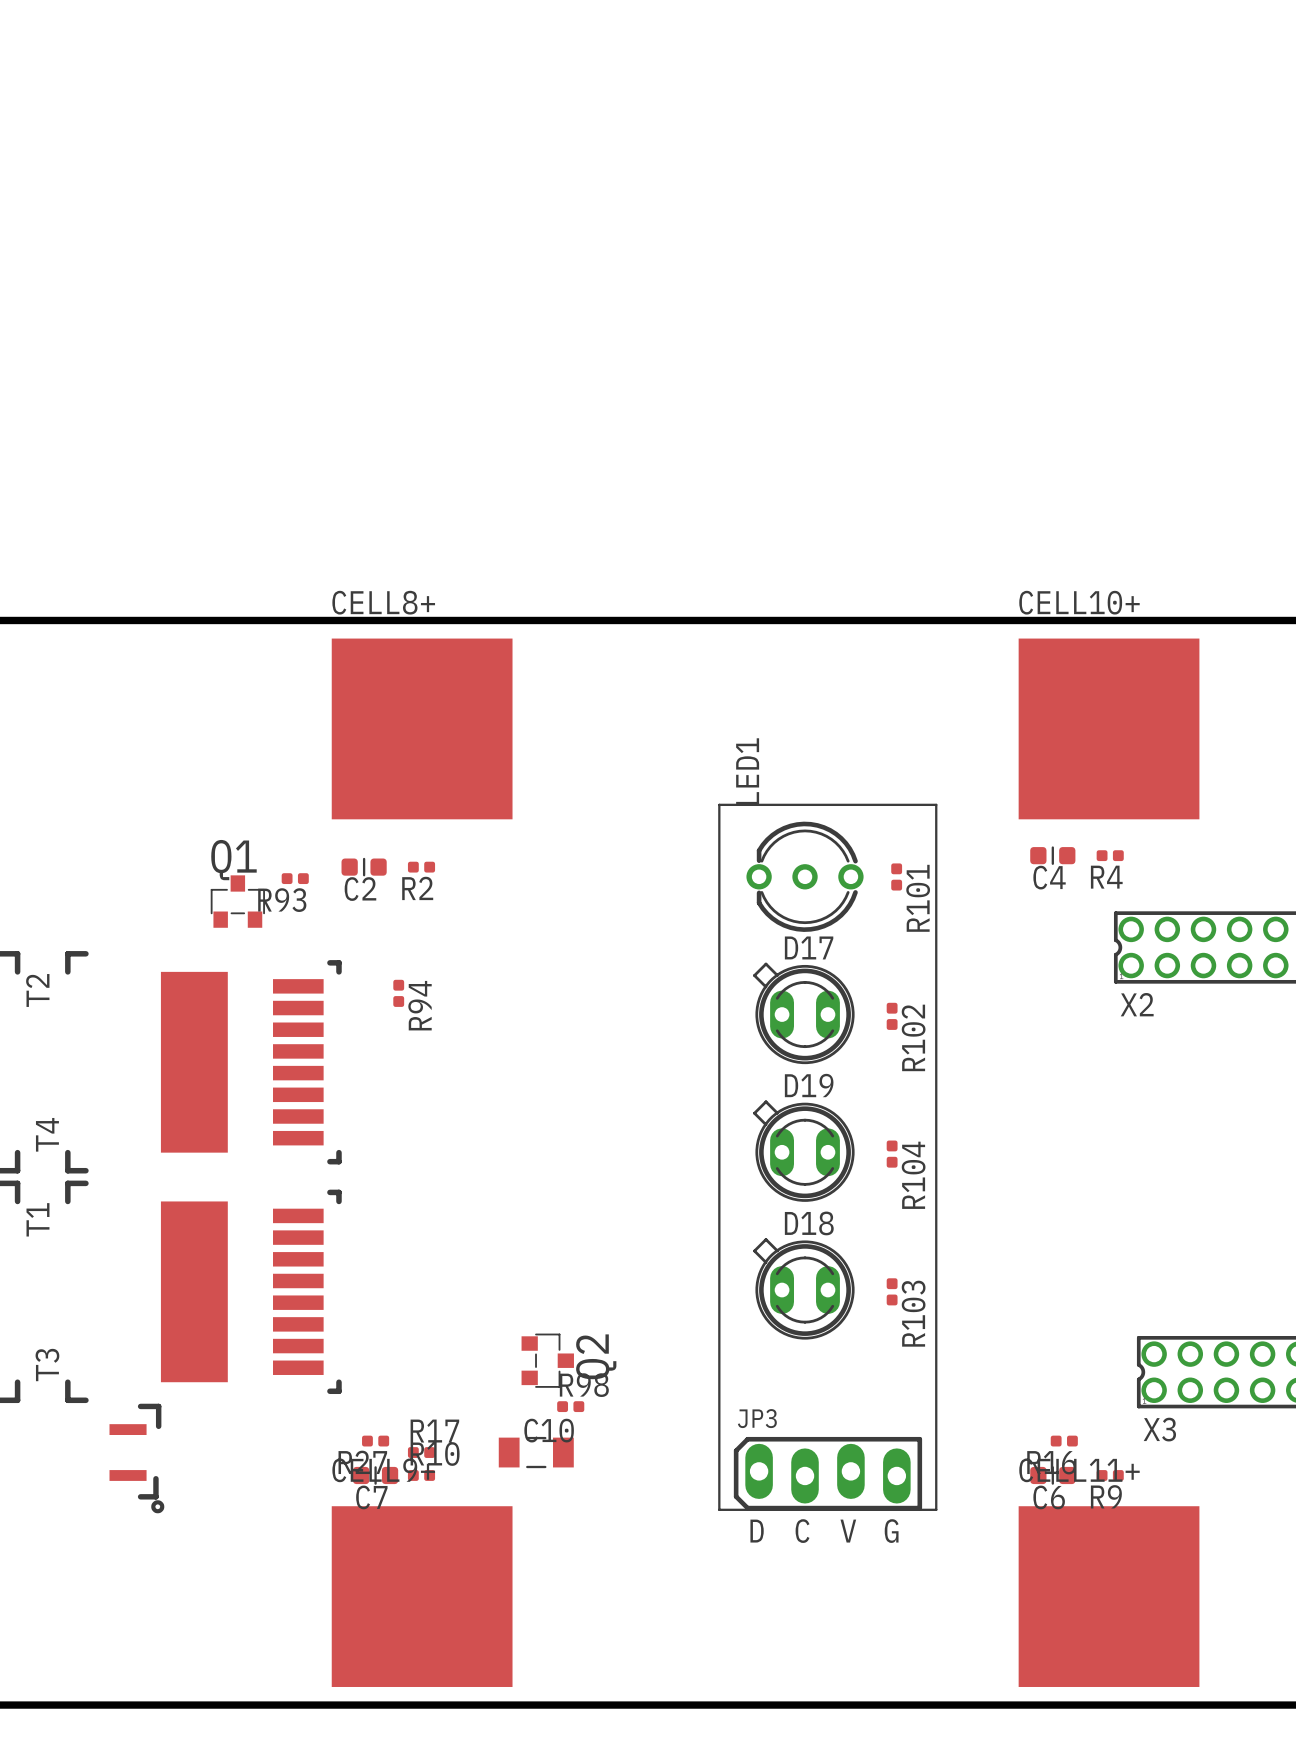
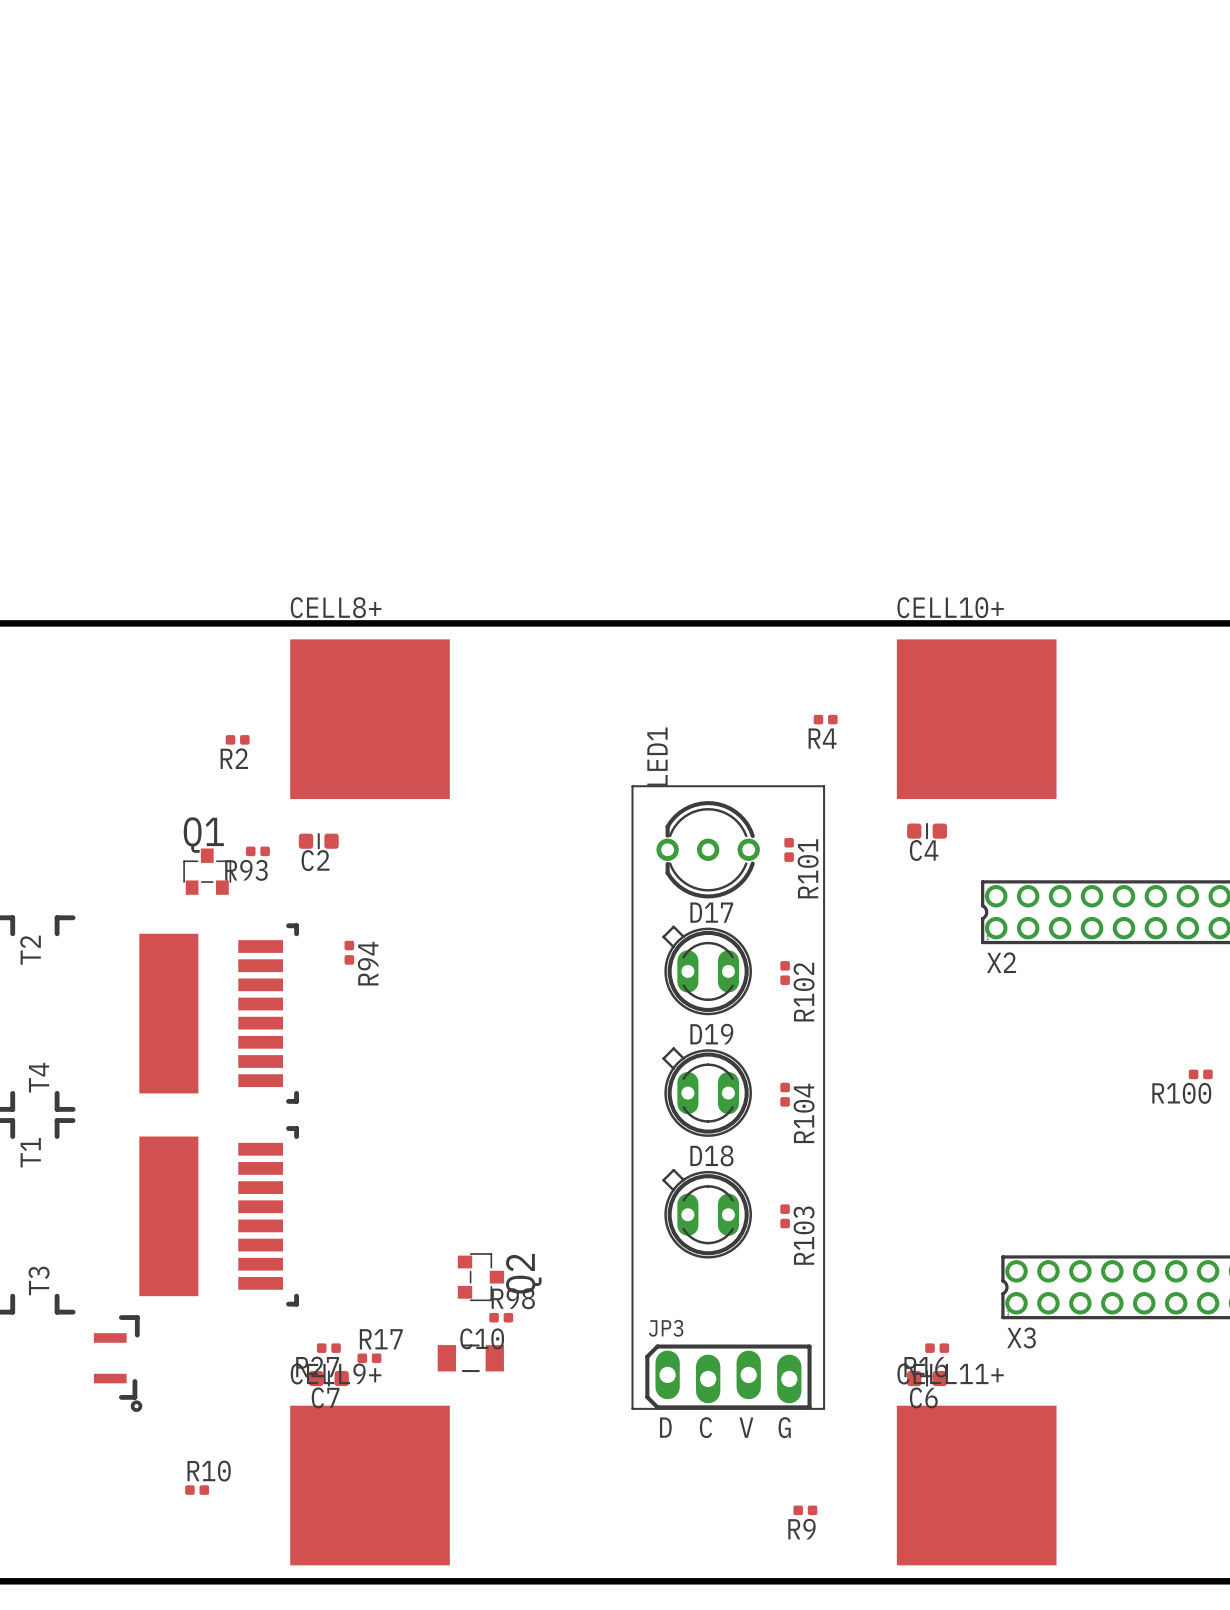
R4 position: (1110, 855) -> (825, 719)
R2 position: (421, 867) -> (237, 739)
R10 position: (421, 1475) -> (197, 1490)
R9 position: (1110, 1475) -> (805, 1510)

